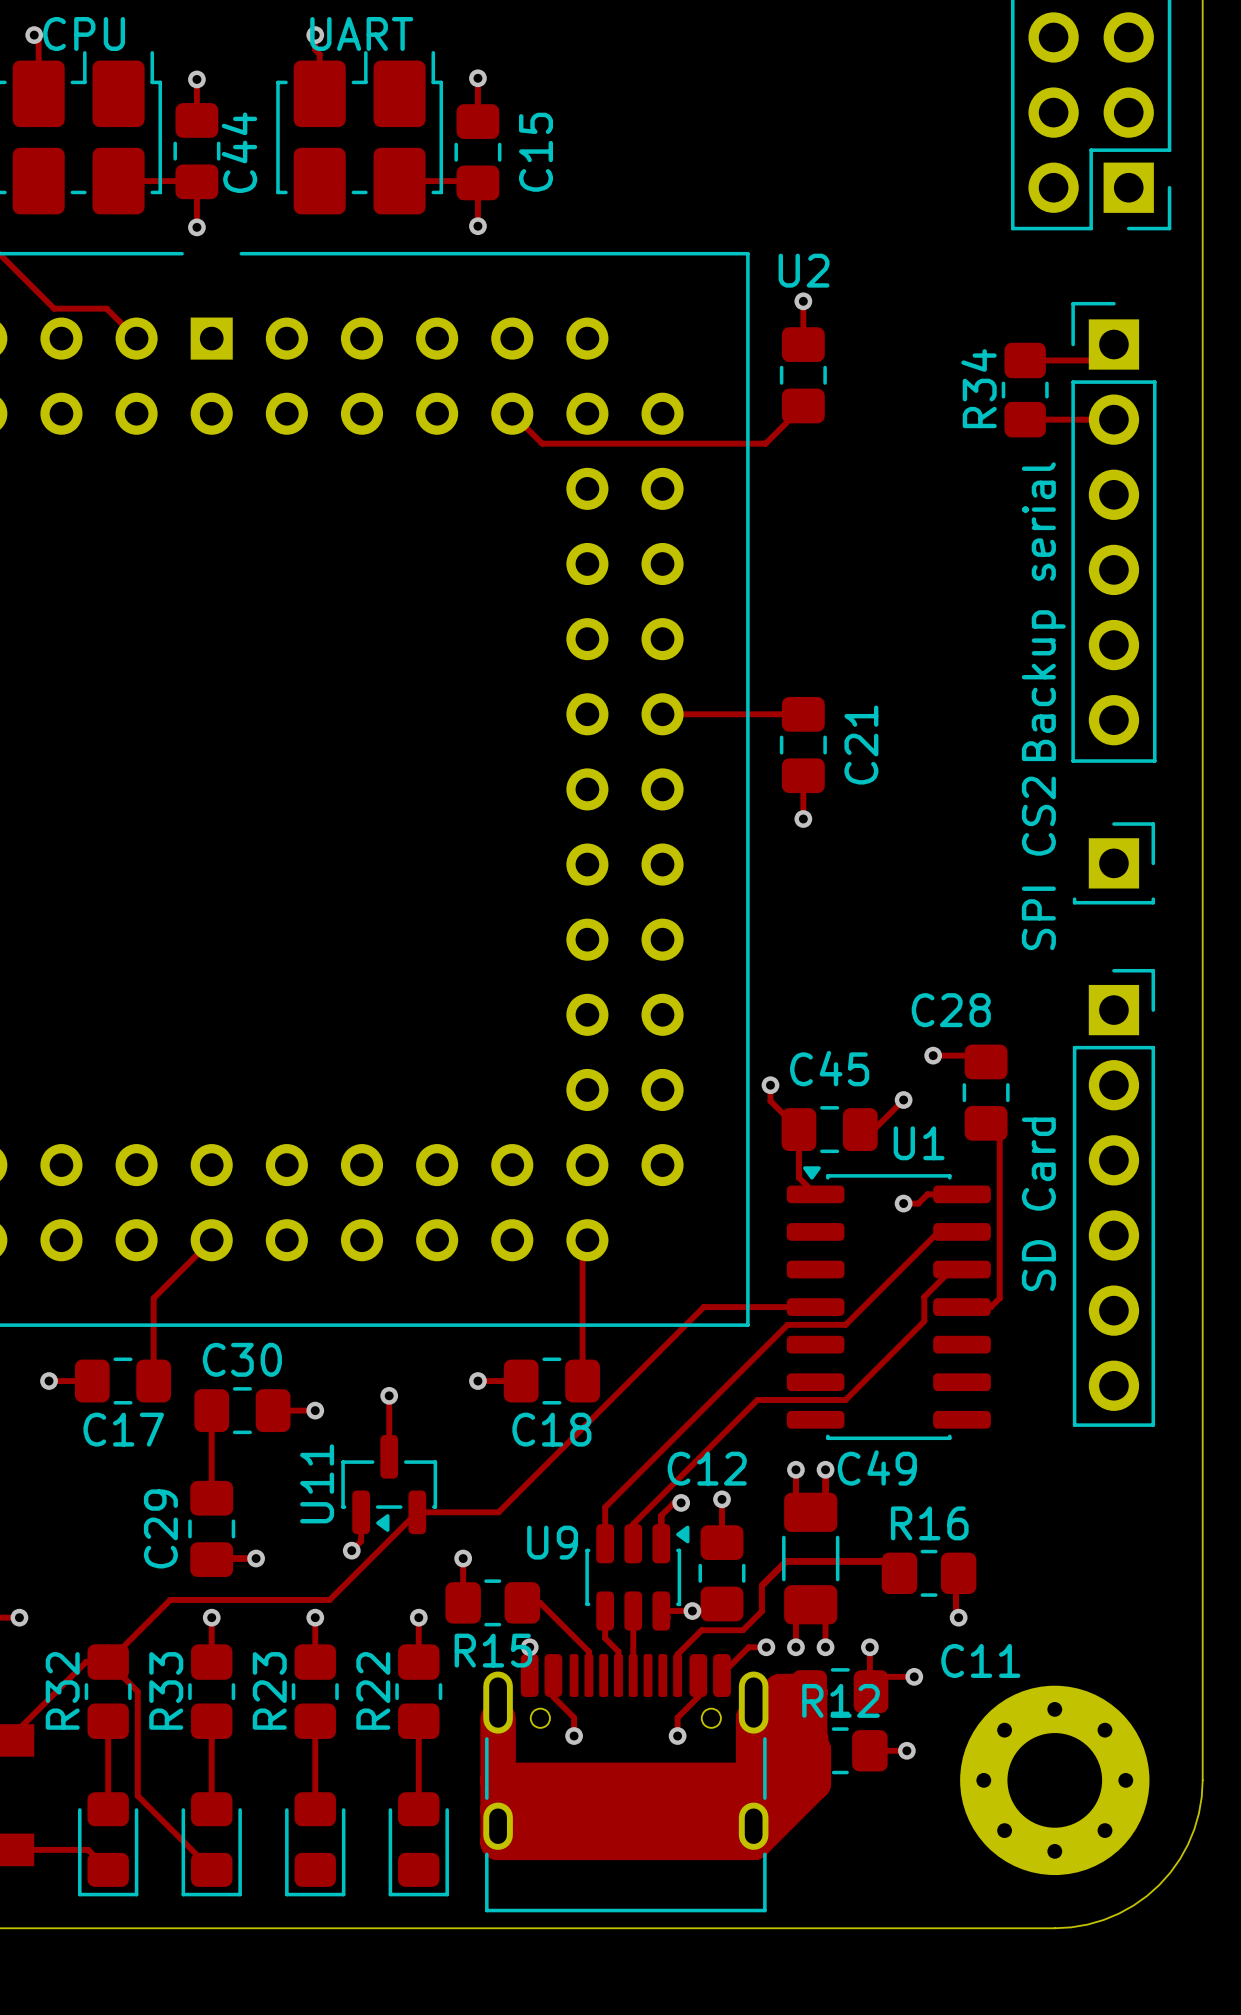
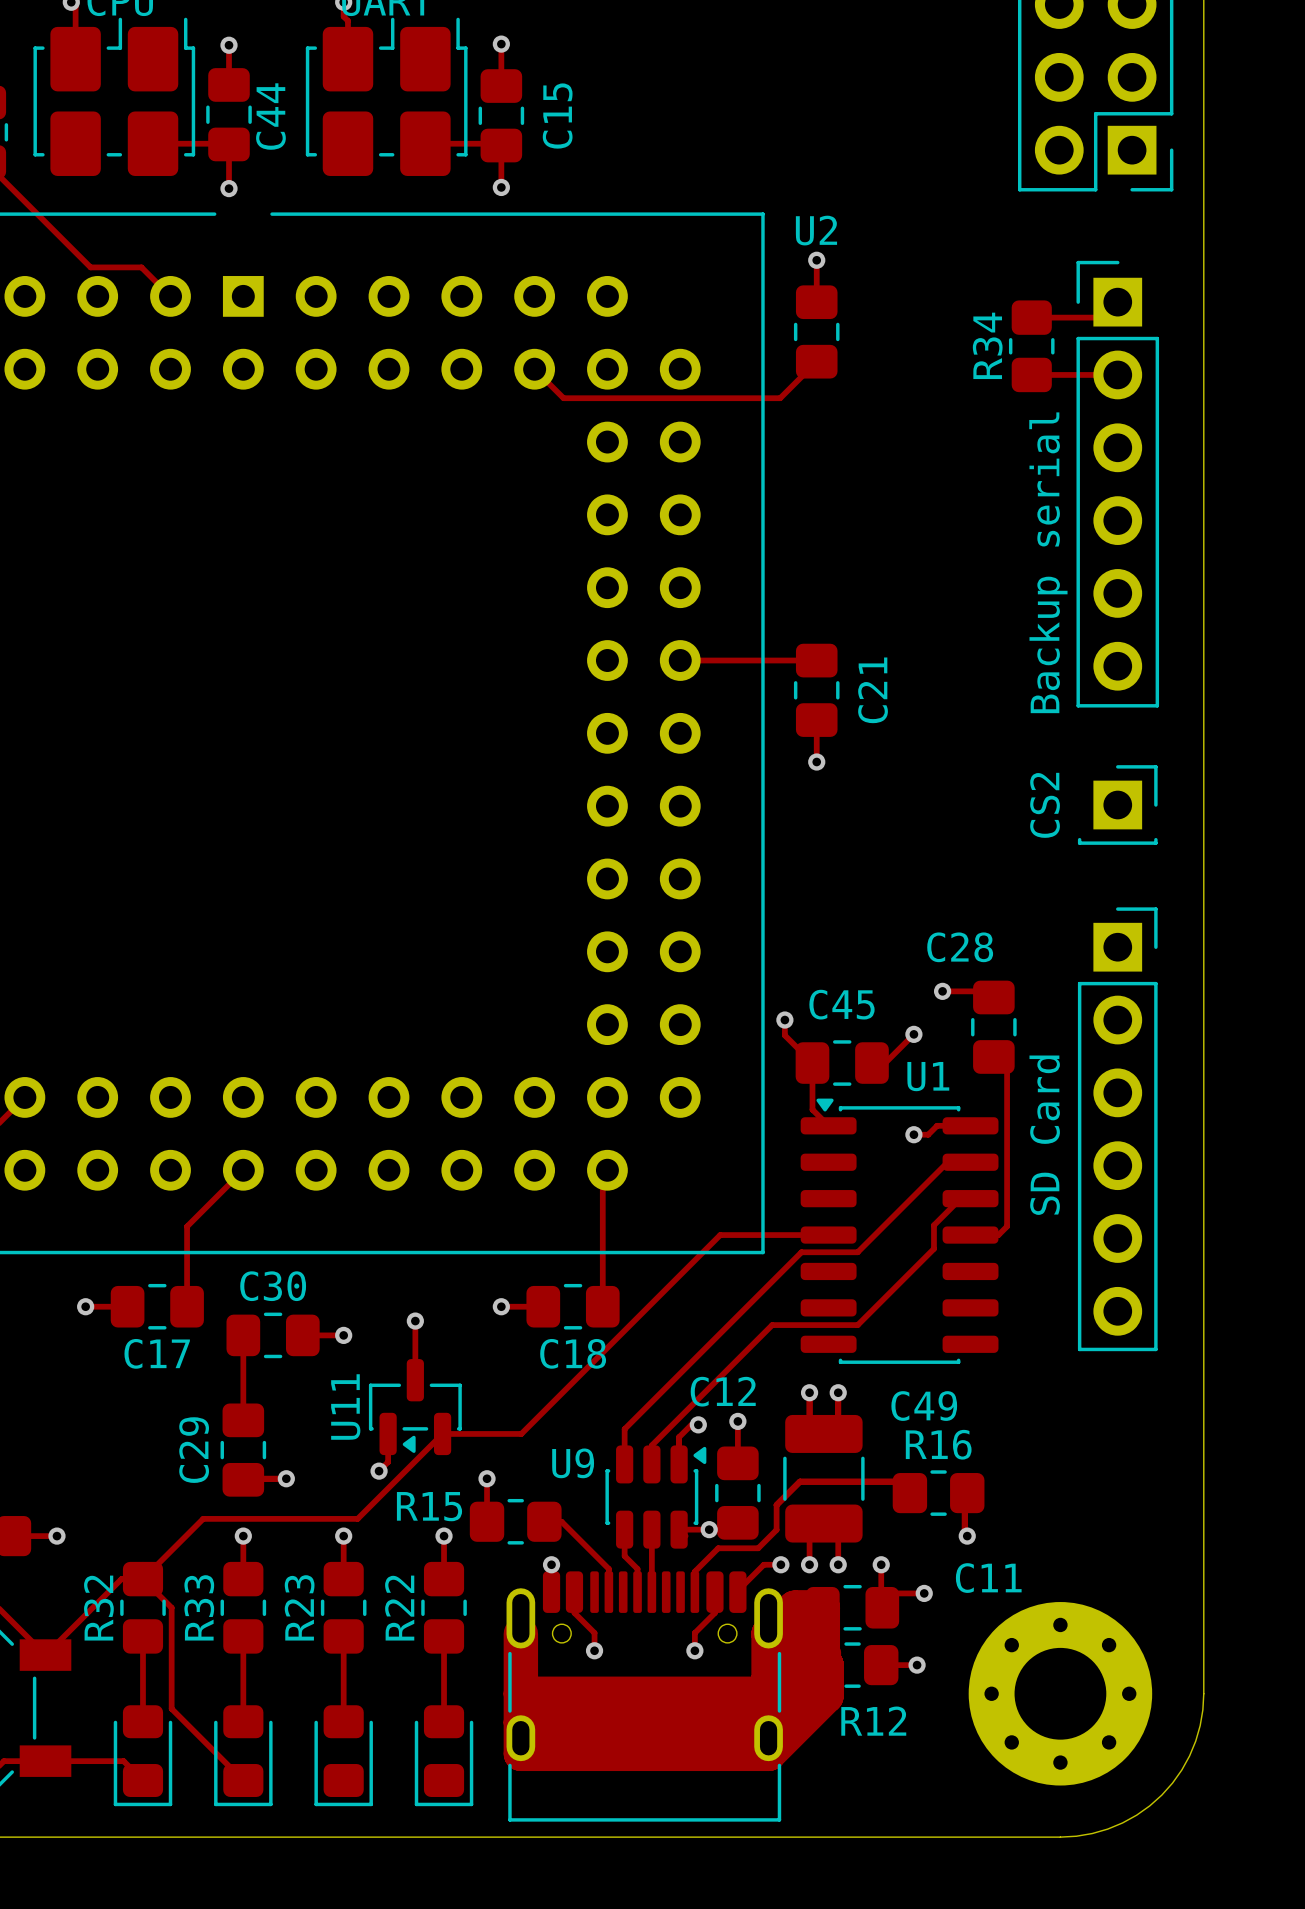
part value: SPI CS2 (1038, 863) -> CS2 (1045, 805)
C49 name position: C49 (877, 1467) -> C49 (924, 1406)
C49 footprint: [782, 1492, 840, 1625] -> [783, 1414, 865, 1543]
R15 name position: R15 (493, 1650) -> R15 (429, 1506)
R12 name position: R12 (841, 1700) -> R12 (873, 1721)

